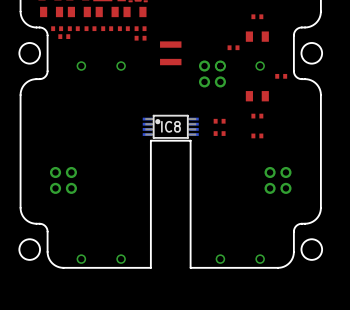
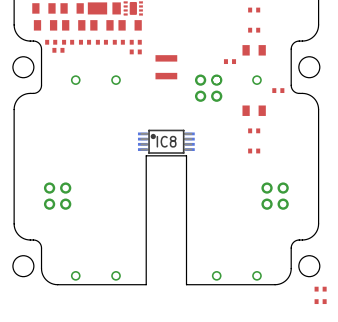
part: (219, 121) -> none
part: (219, 133) -> none
part: none -> (320, 289)
part: none -> (320, 301)

